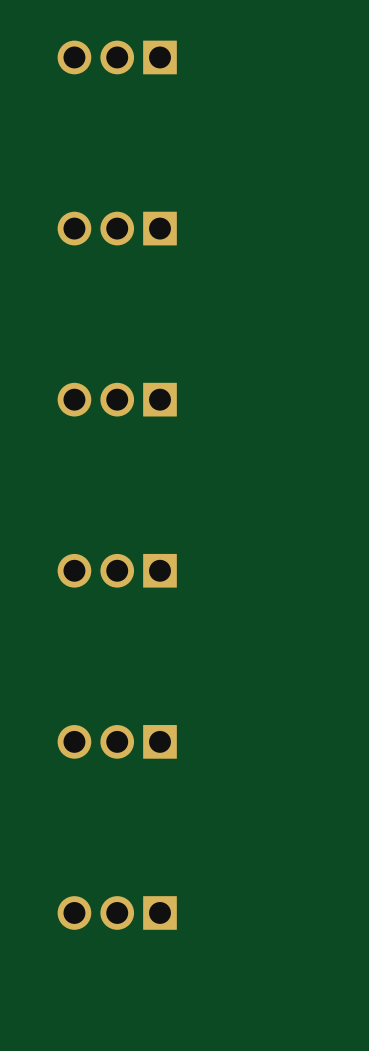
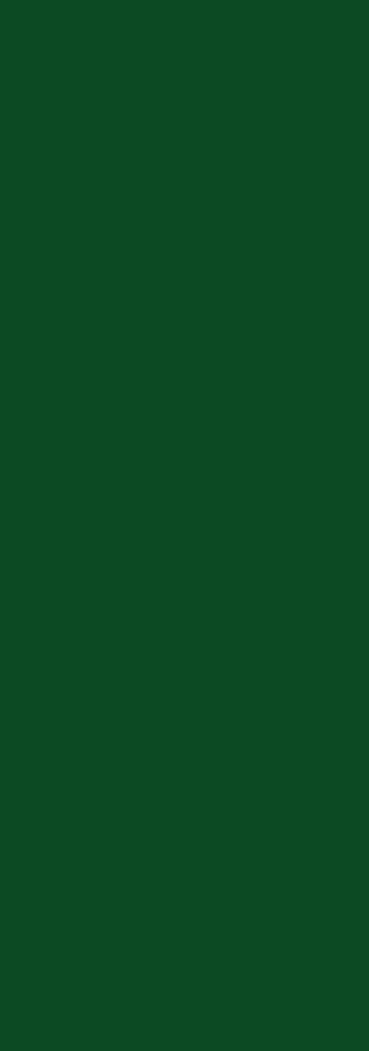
part: (117, 57) -> none
part: (117, 228) -> none
part: (117, 399) -> none
part: (117, 570) -> none
part: (117, 741) -> none
part: (117, 912) -> none

